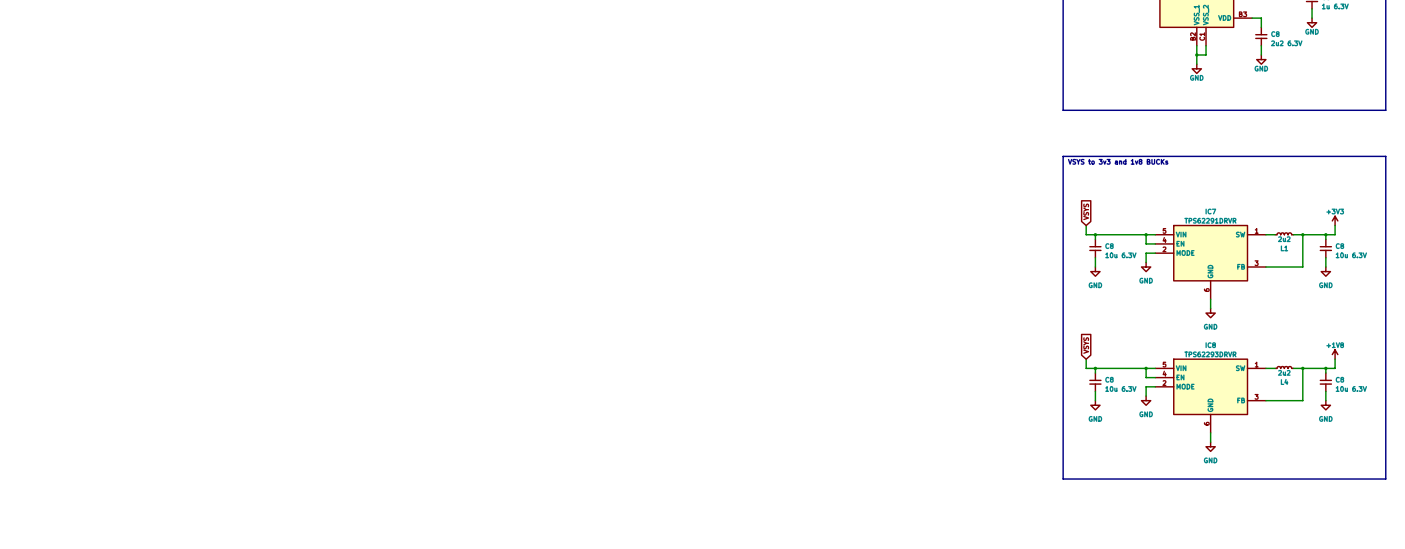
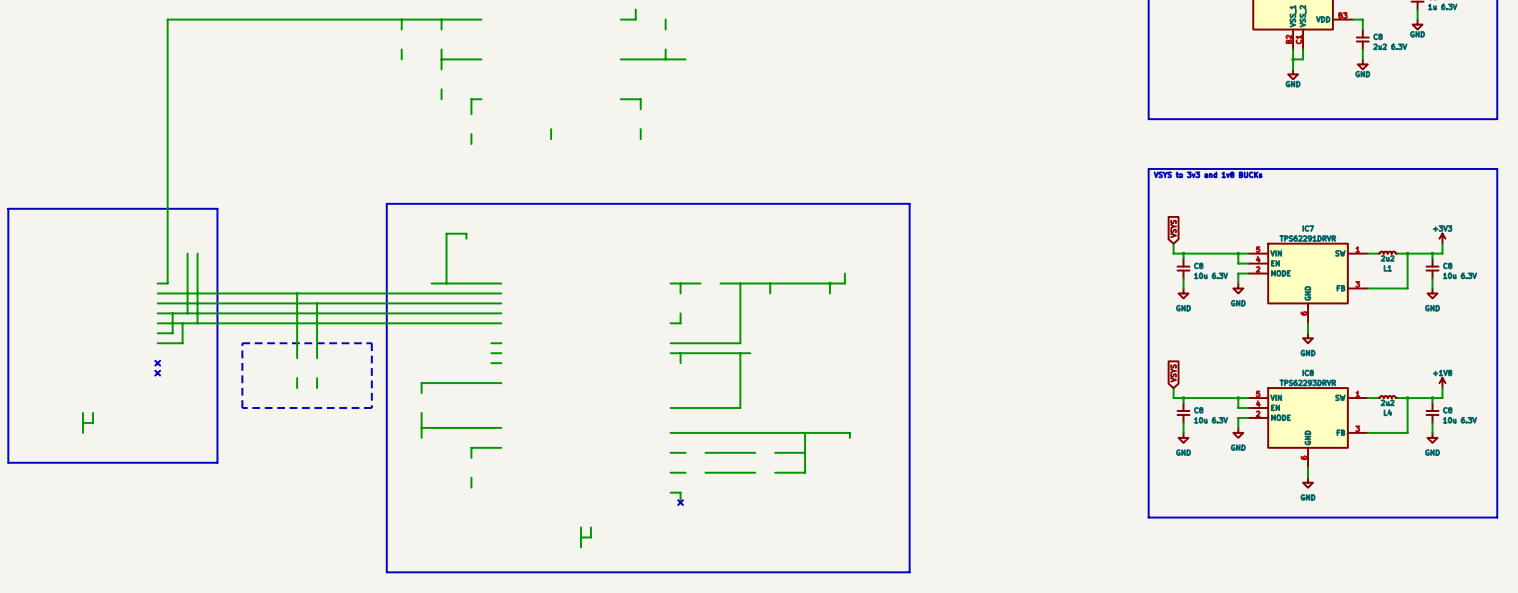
wire: none -> (635, 9) (635, 19) (620, 19)
wire: none -> (401, 19) (401, 29)
wire: none -> (441, 19) (441, 29)
wire: none -> (481, 19) (167, 19) (167, 283) (157, 283)
wire: none -> (665, 19) (665, 29)
wire: none -> (401, 49) (401, 59)
wire: none -> (441, 49) (441, 69)
wire: none -> (665, 49) (665, 59)
wire: none -> (441, 59) (481, 59)
wire: none -> (620, 59) (685, 59)
wire: none -> (441, 89) (441, 99)
wire: none -> (481, 99) (471, 99) (471, 114)
wire: none -> (620, 99) (640, 99) (640, 109)
wire: none -> (551, 129) (551, 139)
wire: none -> (640, 129) (640, 139)
wire: none -> (471, 134) (471, 144)
line: none -> (386, 203) (909, 203) (909, 572) (386, 572) (386, 203)
line: none -> (8, 208) (217, 208) (217, 462) (8, 462) (8, 208)
wire: none -> (466, 238) (466, 233) (446, 233) (446, 283)
wire: none -> (187, 253) (187, 313)
wire: none -> (197, 253) (197, 323)
wire: none -> (844, 273) (844, 283) (720, 283)
wire: none -> (431, 283) (501, 283)
wire: none -> (670, 283) (700, 283)
wire: none -> (680, 283) (680, 293)
wire: none -> (740, 283) (740, 343) (670, 343)
wire: none -> (770, 283) (770, 293)
wire: none -> (829, 283) (829, 293)
wire: none -> (157, 293) (501, 293)
wire: none -> (297, 293) (297, 358)
wire: none -> (157, 303) (501, 303)
wire: none -> (317, 303) (317, 358)
wire: none -> (157, 313) (501, 313)
wire: none -> (172, 313) (172, 333) (157, 333)
wire: none -> (680, 313) (680, 323) (670, 323)
wire: none -> (157, 323) (501, 323)
wire: none -> (182, 323) (182, 343) (157, 343)
line: none -> (242, 343) (371, 343) (371, 407) (242, 407) (242, 343)
wire: none -> (491, 343) (501, 343)
wire: none -> (491, 353) (501, 353)
wire: none -> (670, 353) (750, 353)
wire: none -> (680, 353) (680, 363)
wire: none -> (740, 353) (740, 407) (670, 407)
no-connect mark: none -> (157, 363)
wire: none -> (491, 363) (501, 363)
no-connect mark: none -> (157, 373)
wire: none -> (297, 378) (297, 388)
wire: none -> (317, 378) (317, 388)
wire: none -> (501, 383) (421, 383) (421, 393)
wire: none -> (83, 412) (83, 432)
wire: none -> (92, 412) (92, 422) (83, 422)
wire: none -> (421, 412) (421, 437)
wire: none -> (421, 427) (501, 427)
wire: none -> (670, 432) (849, 432) (849, 437)
wire: none -> (805, 432) (805, 472) (775, 472)
wire: none -> (501, 447) (471, 447) (471, 457)
wire: none -> (670, 452) (685, 452)
wire: none -> (705, 452) (755, 452)
wire: none -> (775, 452) (805, 452)
wire: none -> (670, 472) (685, 472)
wire: none -> (705, 472) (755, 472)
wire: none -> (471, 477) (471, 487)
wire: none -> (670, 492) (680, 492) (680, 502)
no-connect mark: none -> (680, 502)
wire: none -> (580, 527) (580, 547)
wire: none -> (590, 527) (590, 537) (580, 537)

